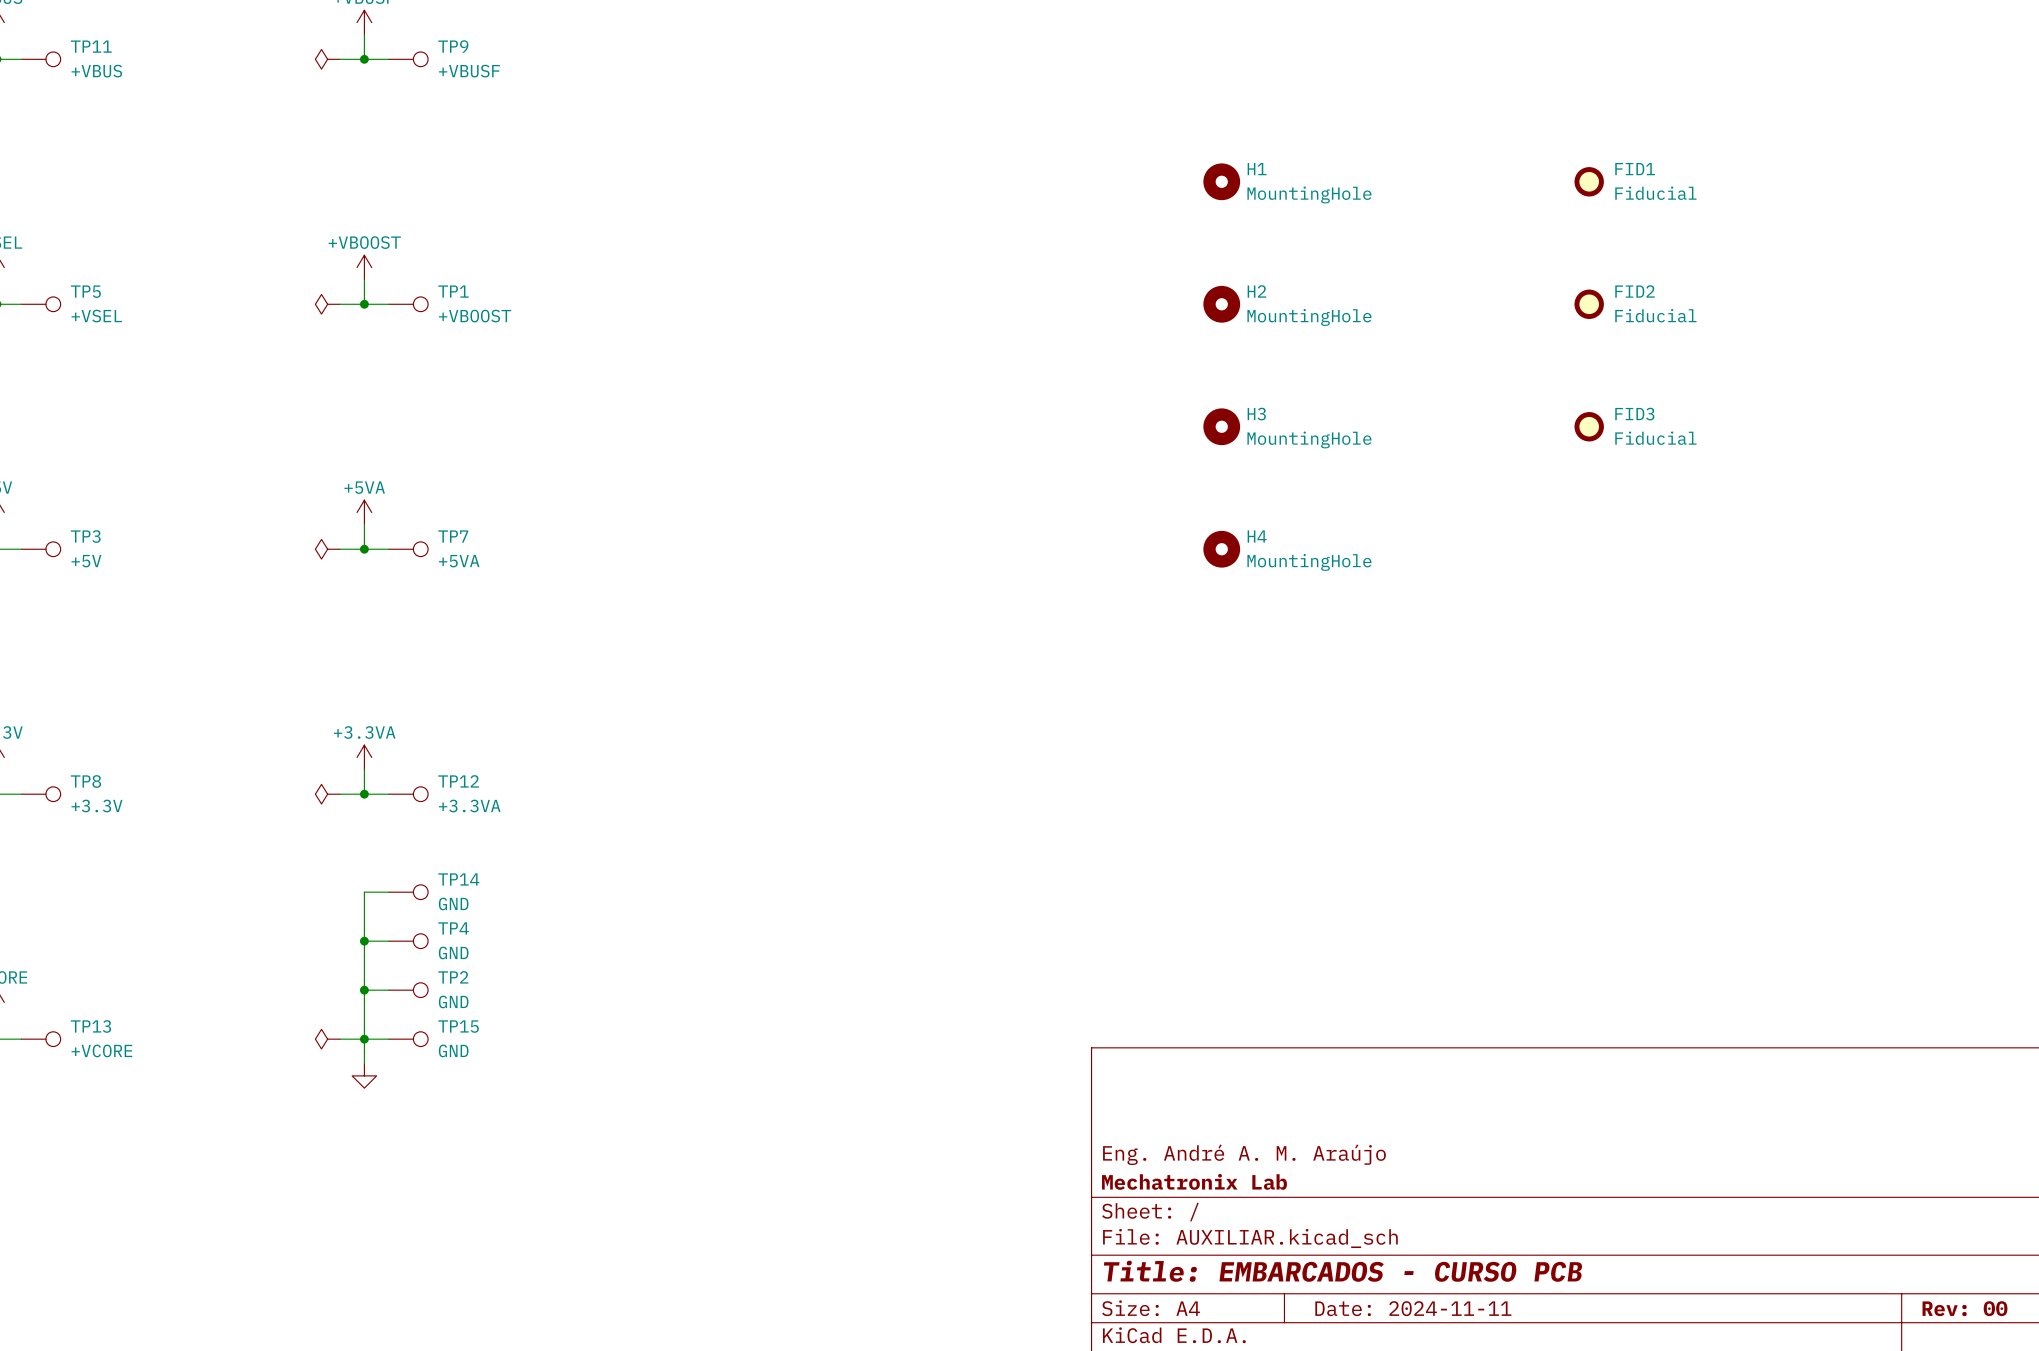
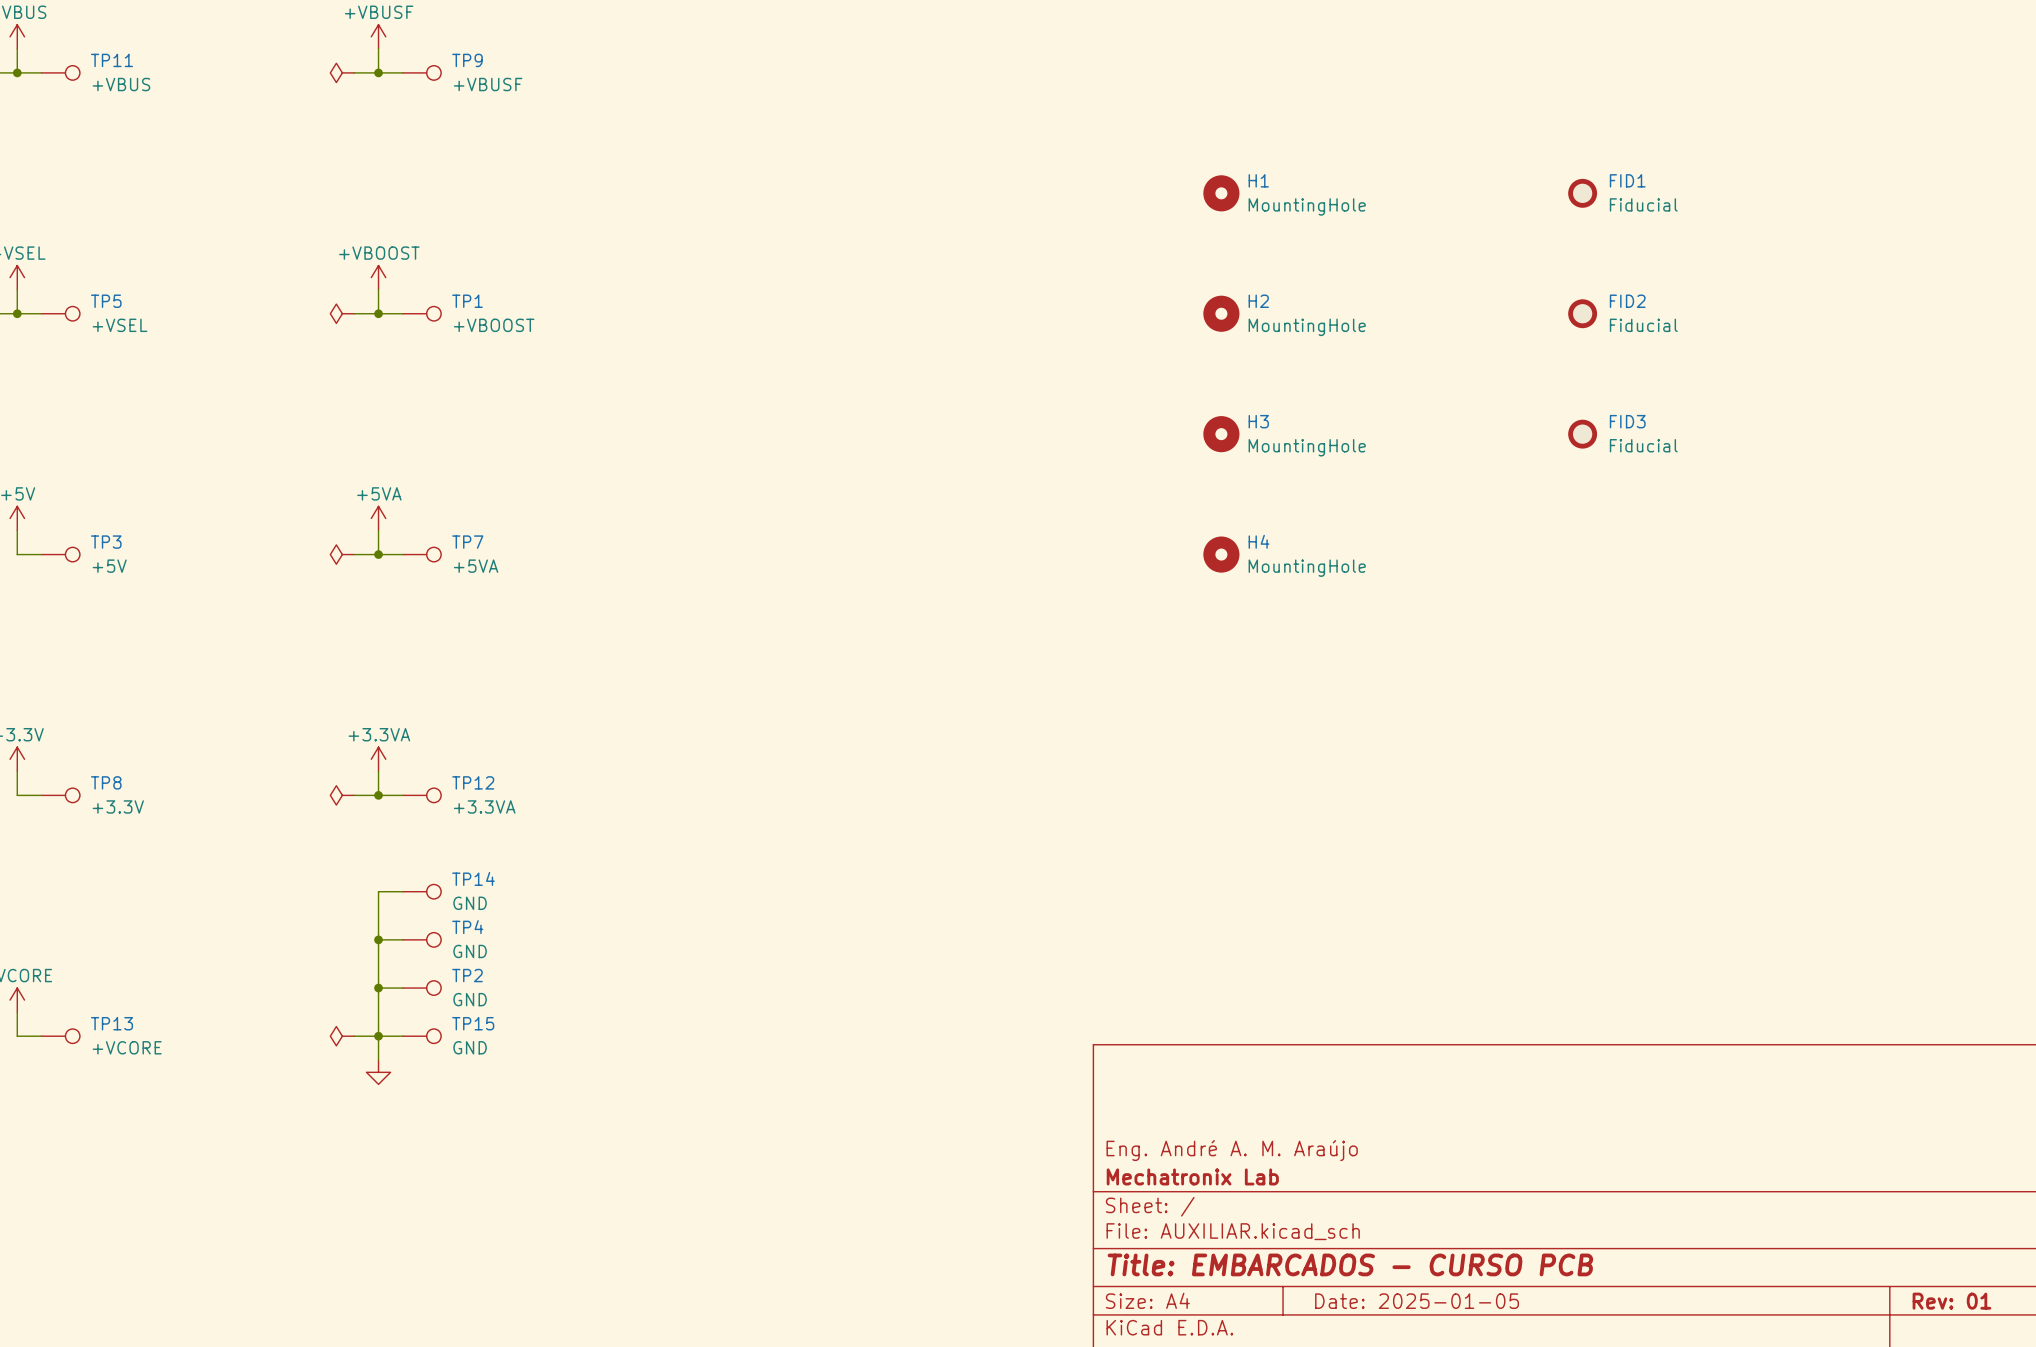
title block: Date: 2024-11-11 (1413, 1308) -> Date: 2025-01-05 (1417, 1301)
title block: Rev: 00 (1964, 1308) -> Rev: 01 (1951, 1301)

